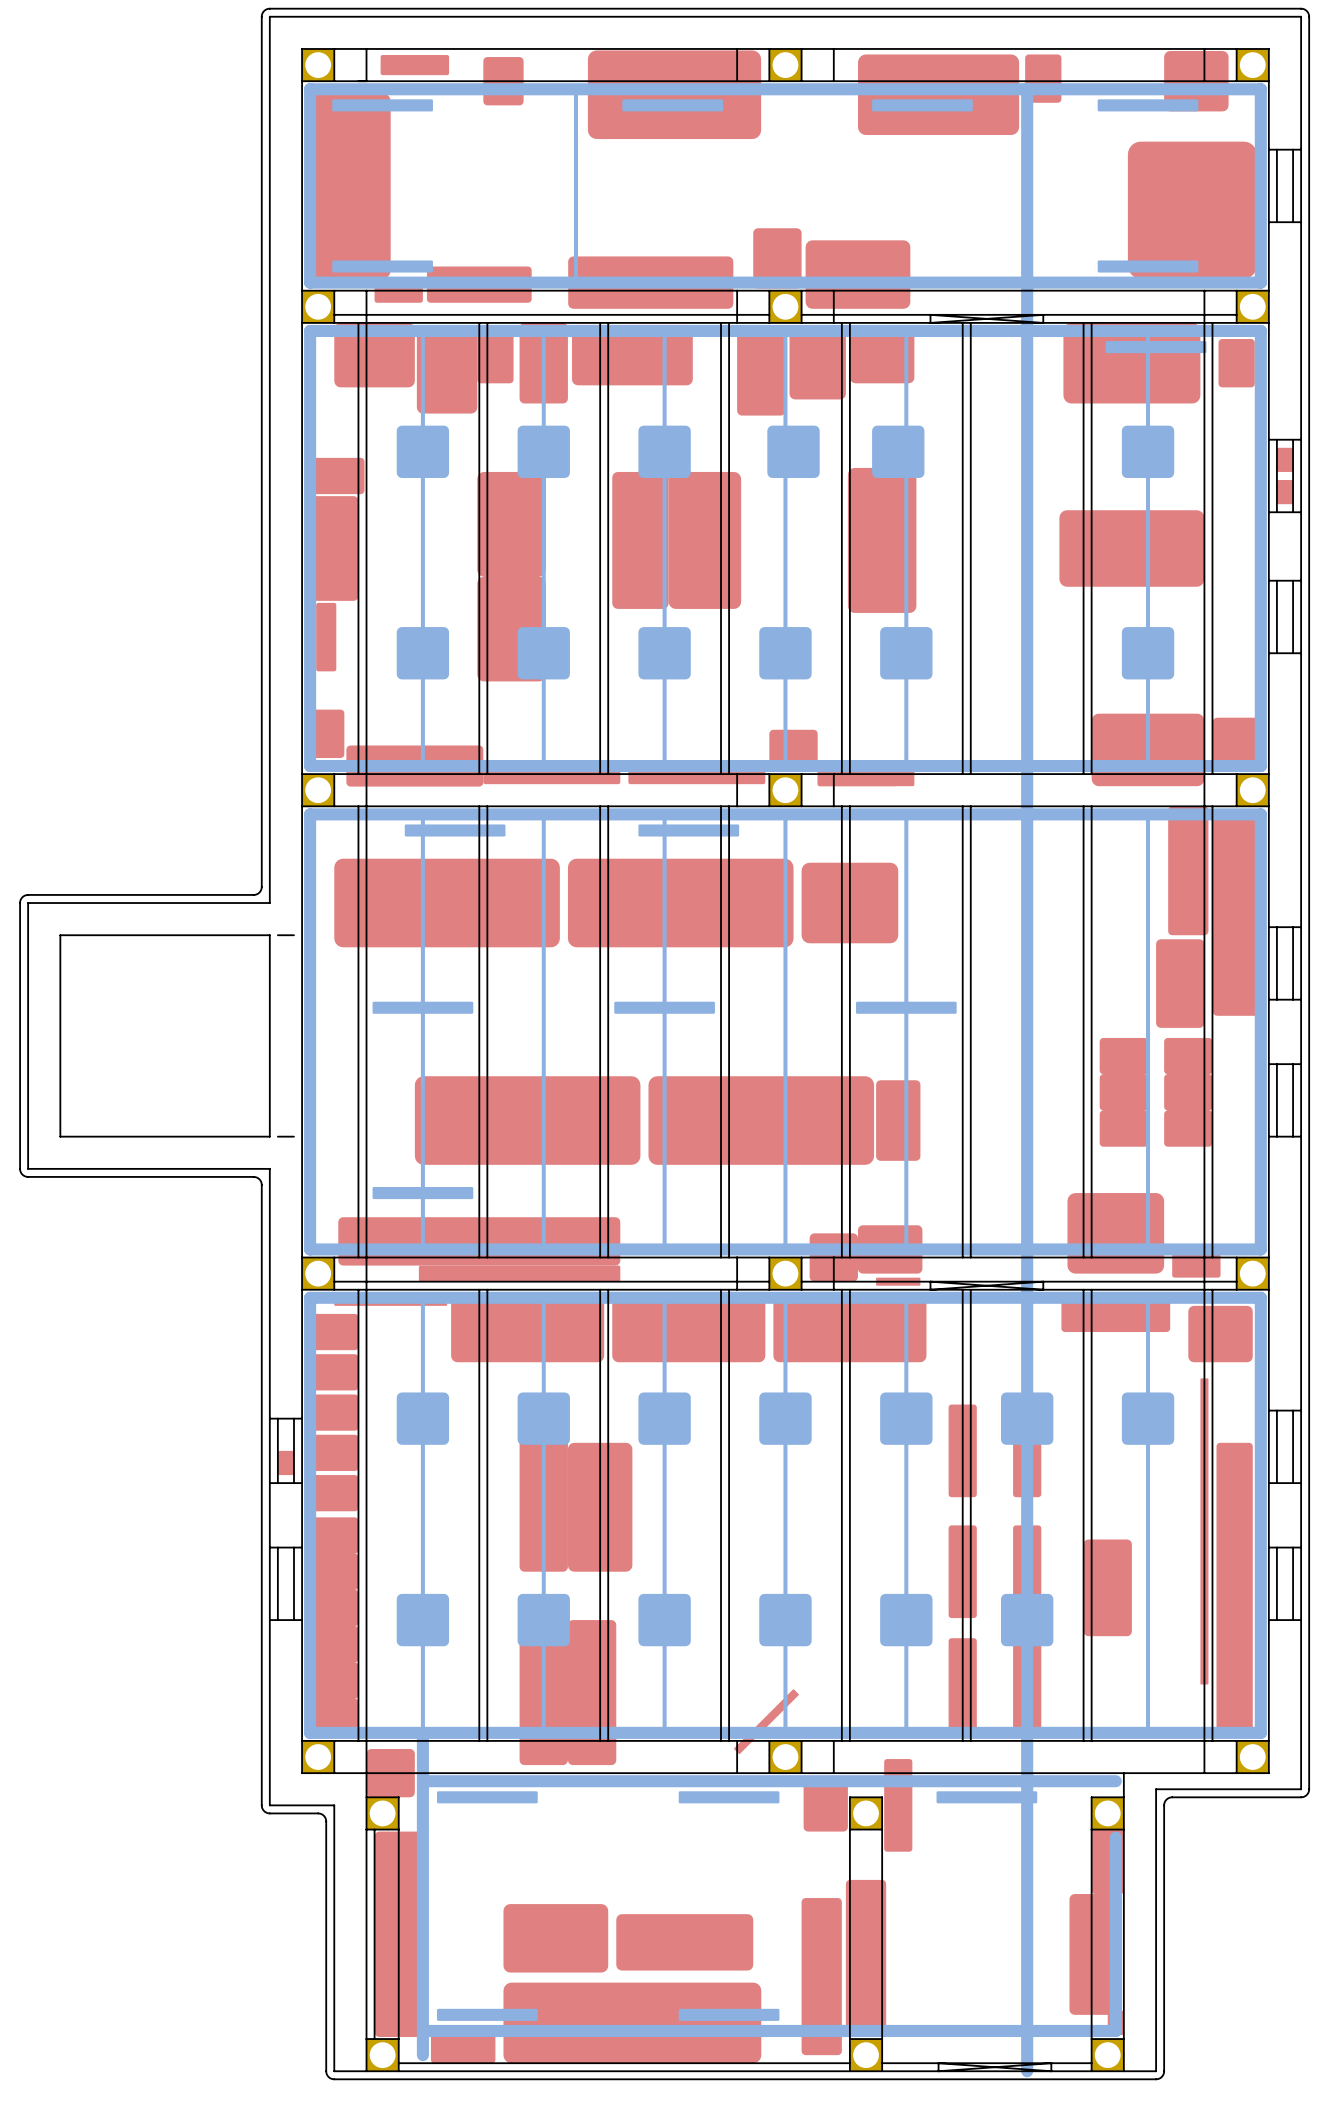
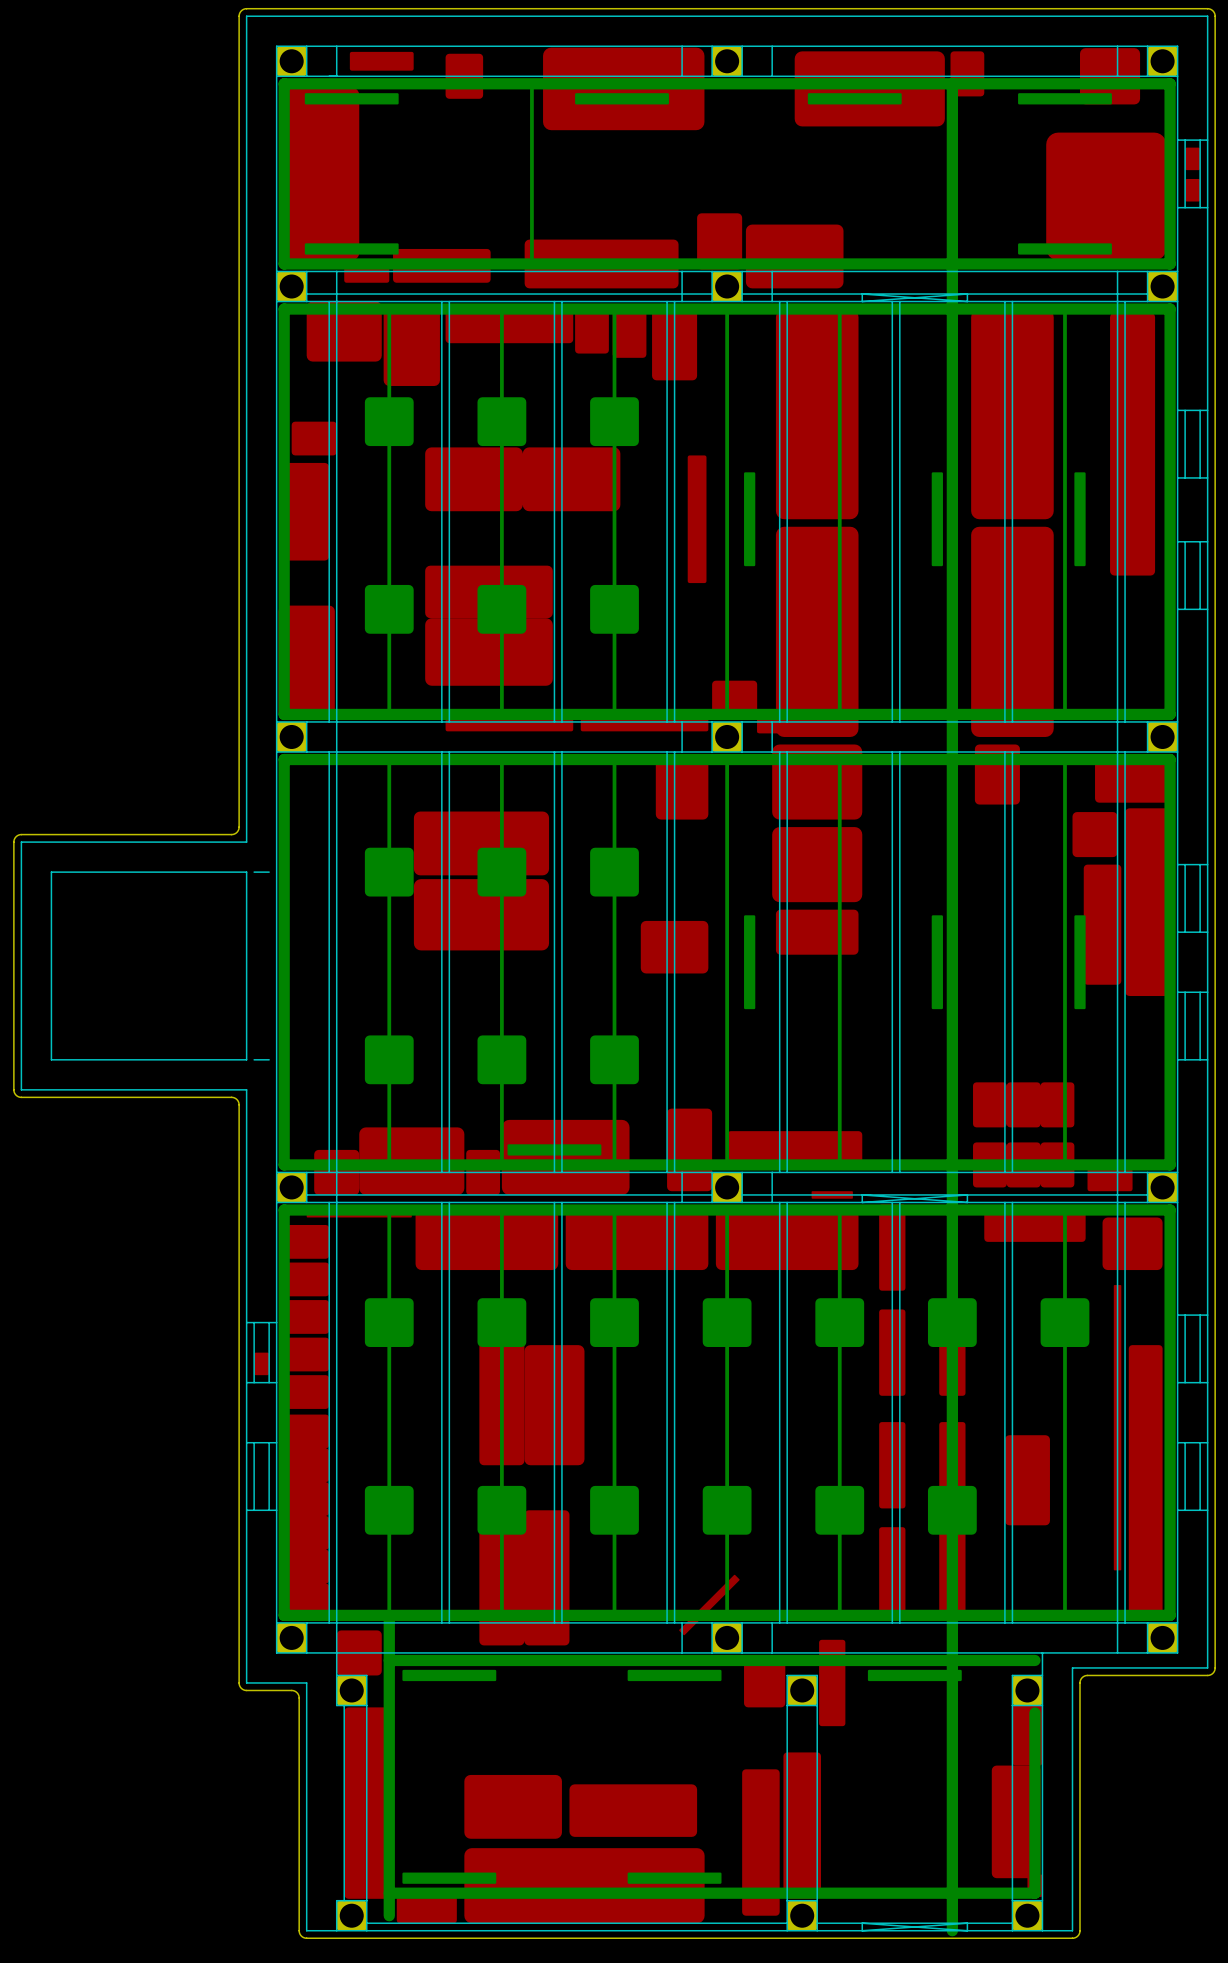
part footprint: [19, 8, 1310, 2080] -> [13, 8, 1216, 1939]
part: none -> (1192, 158)
part: none -> (1192, 190)
part: none -> (509, 324)
part: (1156, 347) -> none
part: none -> (591, 329)
part position: (495, 355) -> (629, 331)
part: (632, 355) -> none
part: (882, 355) -> none
part position: (543, 363) -> (674, 342)
part: (817, 363) -> none
part: (1131, 363) -> none
part: (1236, 363) -> none
part: (761, 371) -> none
part: none -> (817, 414)
part: none -> (1012, 414)
part: (793, 451) -> none
part: (898, 451) -> none
part: (1148, 451) -> none
part footprint: [312, 457, 365, 495] -> [291, 421, 337, 456]
part: (1284, 459) -> none
part: none -> (1132, 444)
part: (1284, 492) -> none
part: none -> (571, 479)
part rotation: 0° (511, 524) -> 90° clockwise (473, 479)
part rotation: 0° (640, 540) -> 90° clockwise (488, 591)
part position: (640, 540) -> (488, 591)
part: (704, 540) -> none
part: (882, 540) -> none
part: (1131, 548) -> none
part: none -> (697, 519)
part: none -> (749, 519)
part: none -> (937, 519)
part: none -> (1080, 519)
part: (511, 629) -> none
part: (326, 637) -> none
part: (785, 653) -> none
part: (906, 653) -> none
part: (1148, 653) -> none
part: none -> (817, 631)
part: none -> (1012, 631)
part: none -> (488, 651)
part: none -> (306, 661)
part: (326, 733) -> none
part position: (1236, 741) -> (1095, 834)
part: (1148, 749) -> none
part: (414, 766) -> none
part: (455, 830) -> none
part: (688, 830) -> none
part: none -> (997, 774)
part: none -> (817, 782)
part: none -> (1132, 782)
part: none -> (682, 789)
part position: (1188, 870) -> (1102, 924)
part: (447, 903) -> none
part: (680, 903) -> none
part: (849, 903) -> none
part: none -> (481, 843)
part position: (1236, 915) -> (1147, 902)
part: none -> (817, 864)
part: none -> (389, 872)
part: none -> (501, 872)
part: none -> (614, 872)
part: none -> (481, 914)
part: (1180, 983) -> none
part: none -> (817, 932)
part: (422, 1007) -> none
part: (664, 1007) -> none
part: (906, 1007) -> none
part: none -> (674, 947)
part: none -> (749, 962)
part: none -> (937, 962)
part: none -> (1080, 962)
part: (1123, 1056) -> none
part: (1188, 1056) -> none
part: (1123, 1092) -> none
part: (1188, 1092) -> none
part: (527, 1120) -> none
part: (761, 1120) -> none
part: (898, 1120) -> none
part: (1123, 1128) -> none
part: (1188, 1128) -> none
part: none -> (389, 1059)
part: none -> (501, 1059)
part: none -> (614, 1059)
part: none -> (989, 1104)
part: none -> (1023, 1104)
part: none -> (1057, 1104)
part: (422, 1193) -> none
part: none -> (554, 1149)
part: none -> (689, 1149)
part: none -> (794, 1149)
part: (1115, 1233) -> none
part: (479, 1241) -> none
part: none -> (565, 1157)
part: none -> (411, 1161)
part: (890, 1249) -> none
part: none -> (989, 1164)
part: none -> (1023, 1164)
part: none -> (1057, 1164)
part: none -> (336, 1172)
part: none -> (483, 1172)
part: (833, 1257) -> none
part: (519, 1273) -> none
part: none -> (892, 1247)

